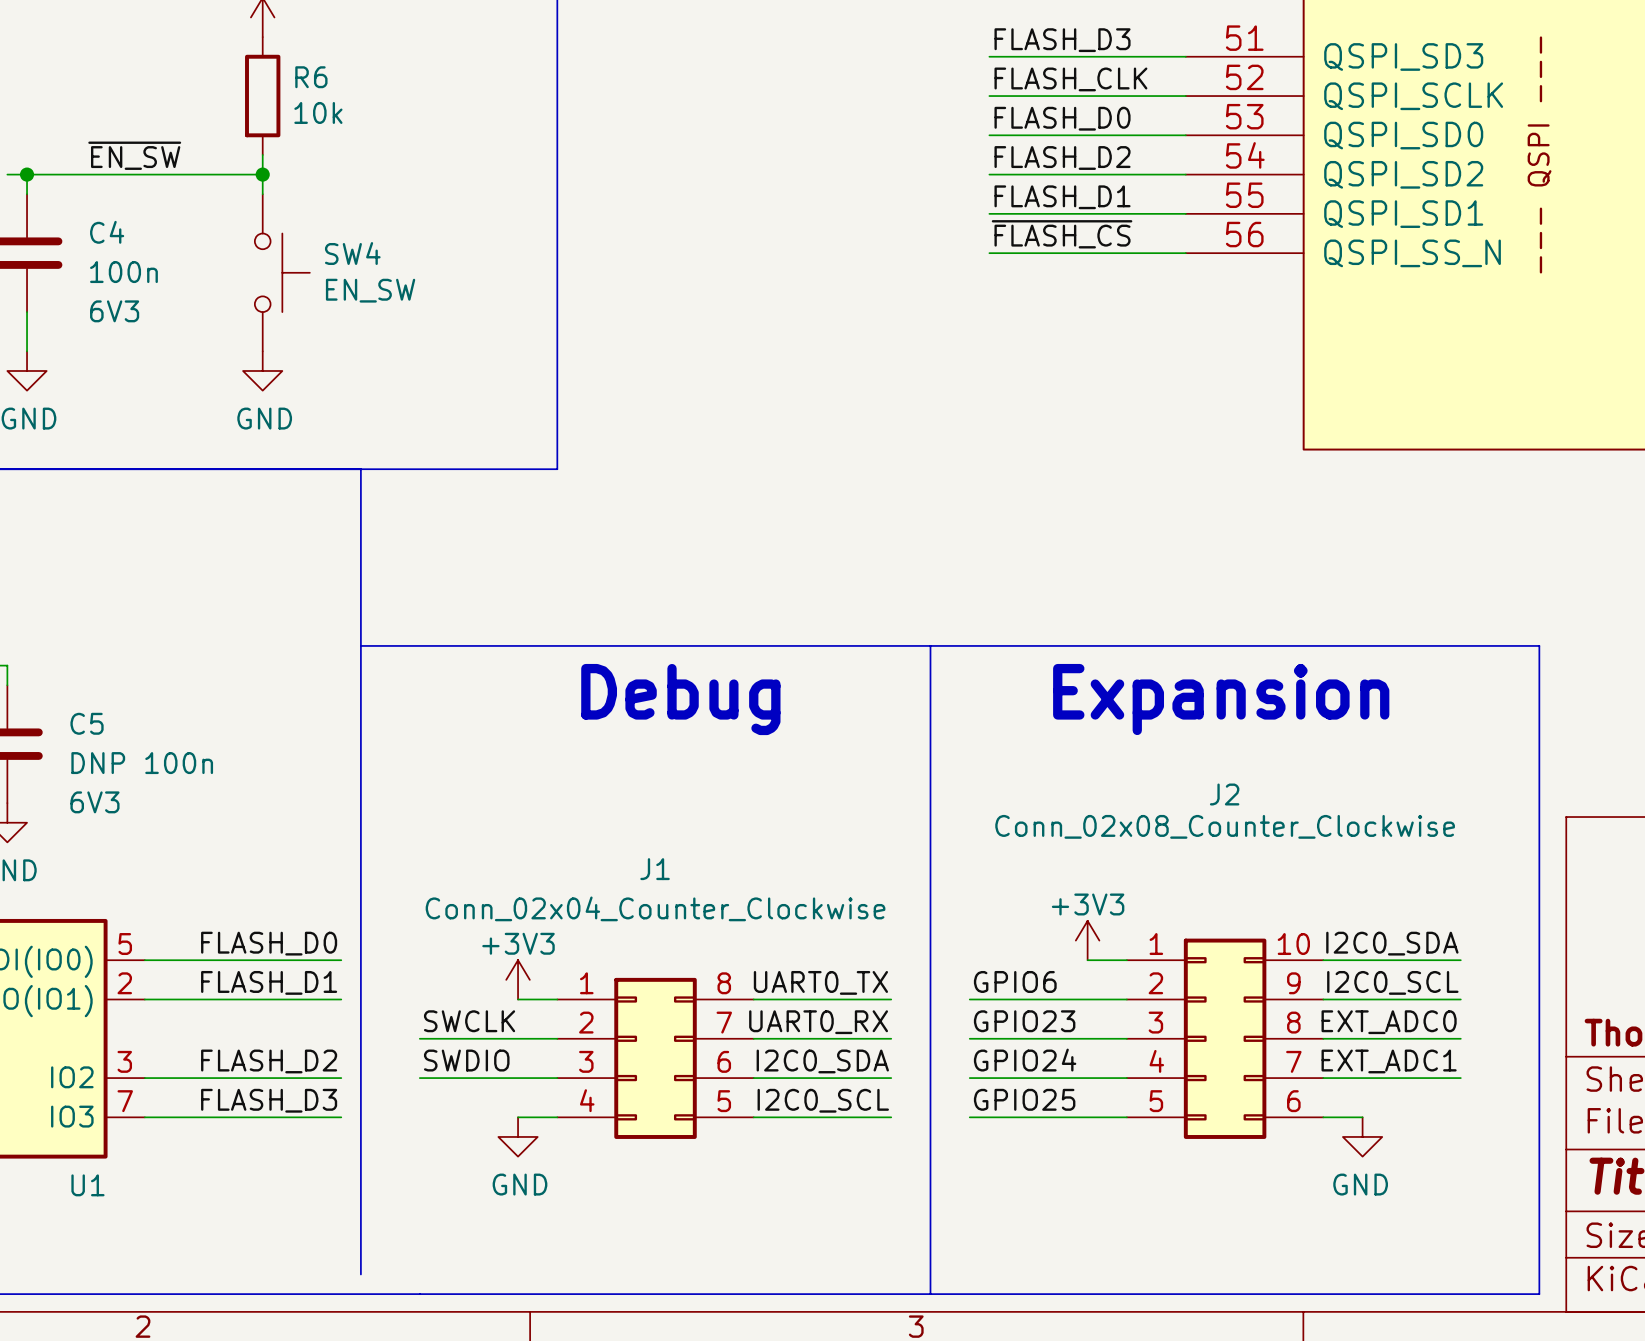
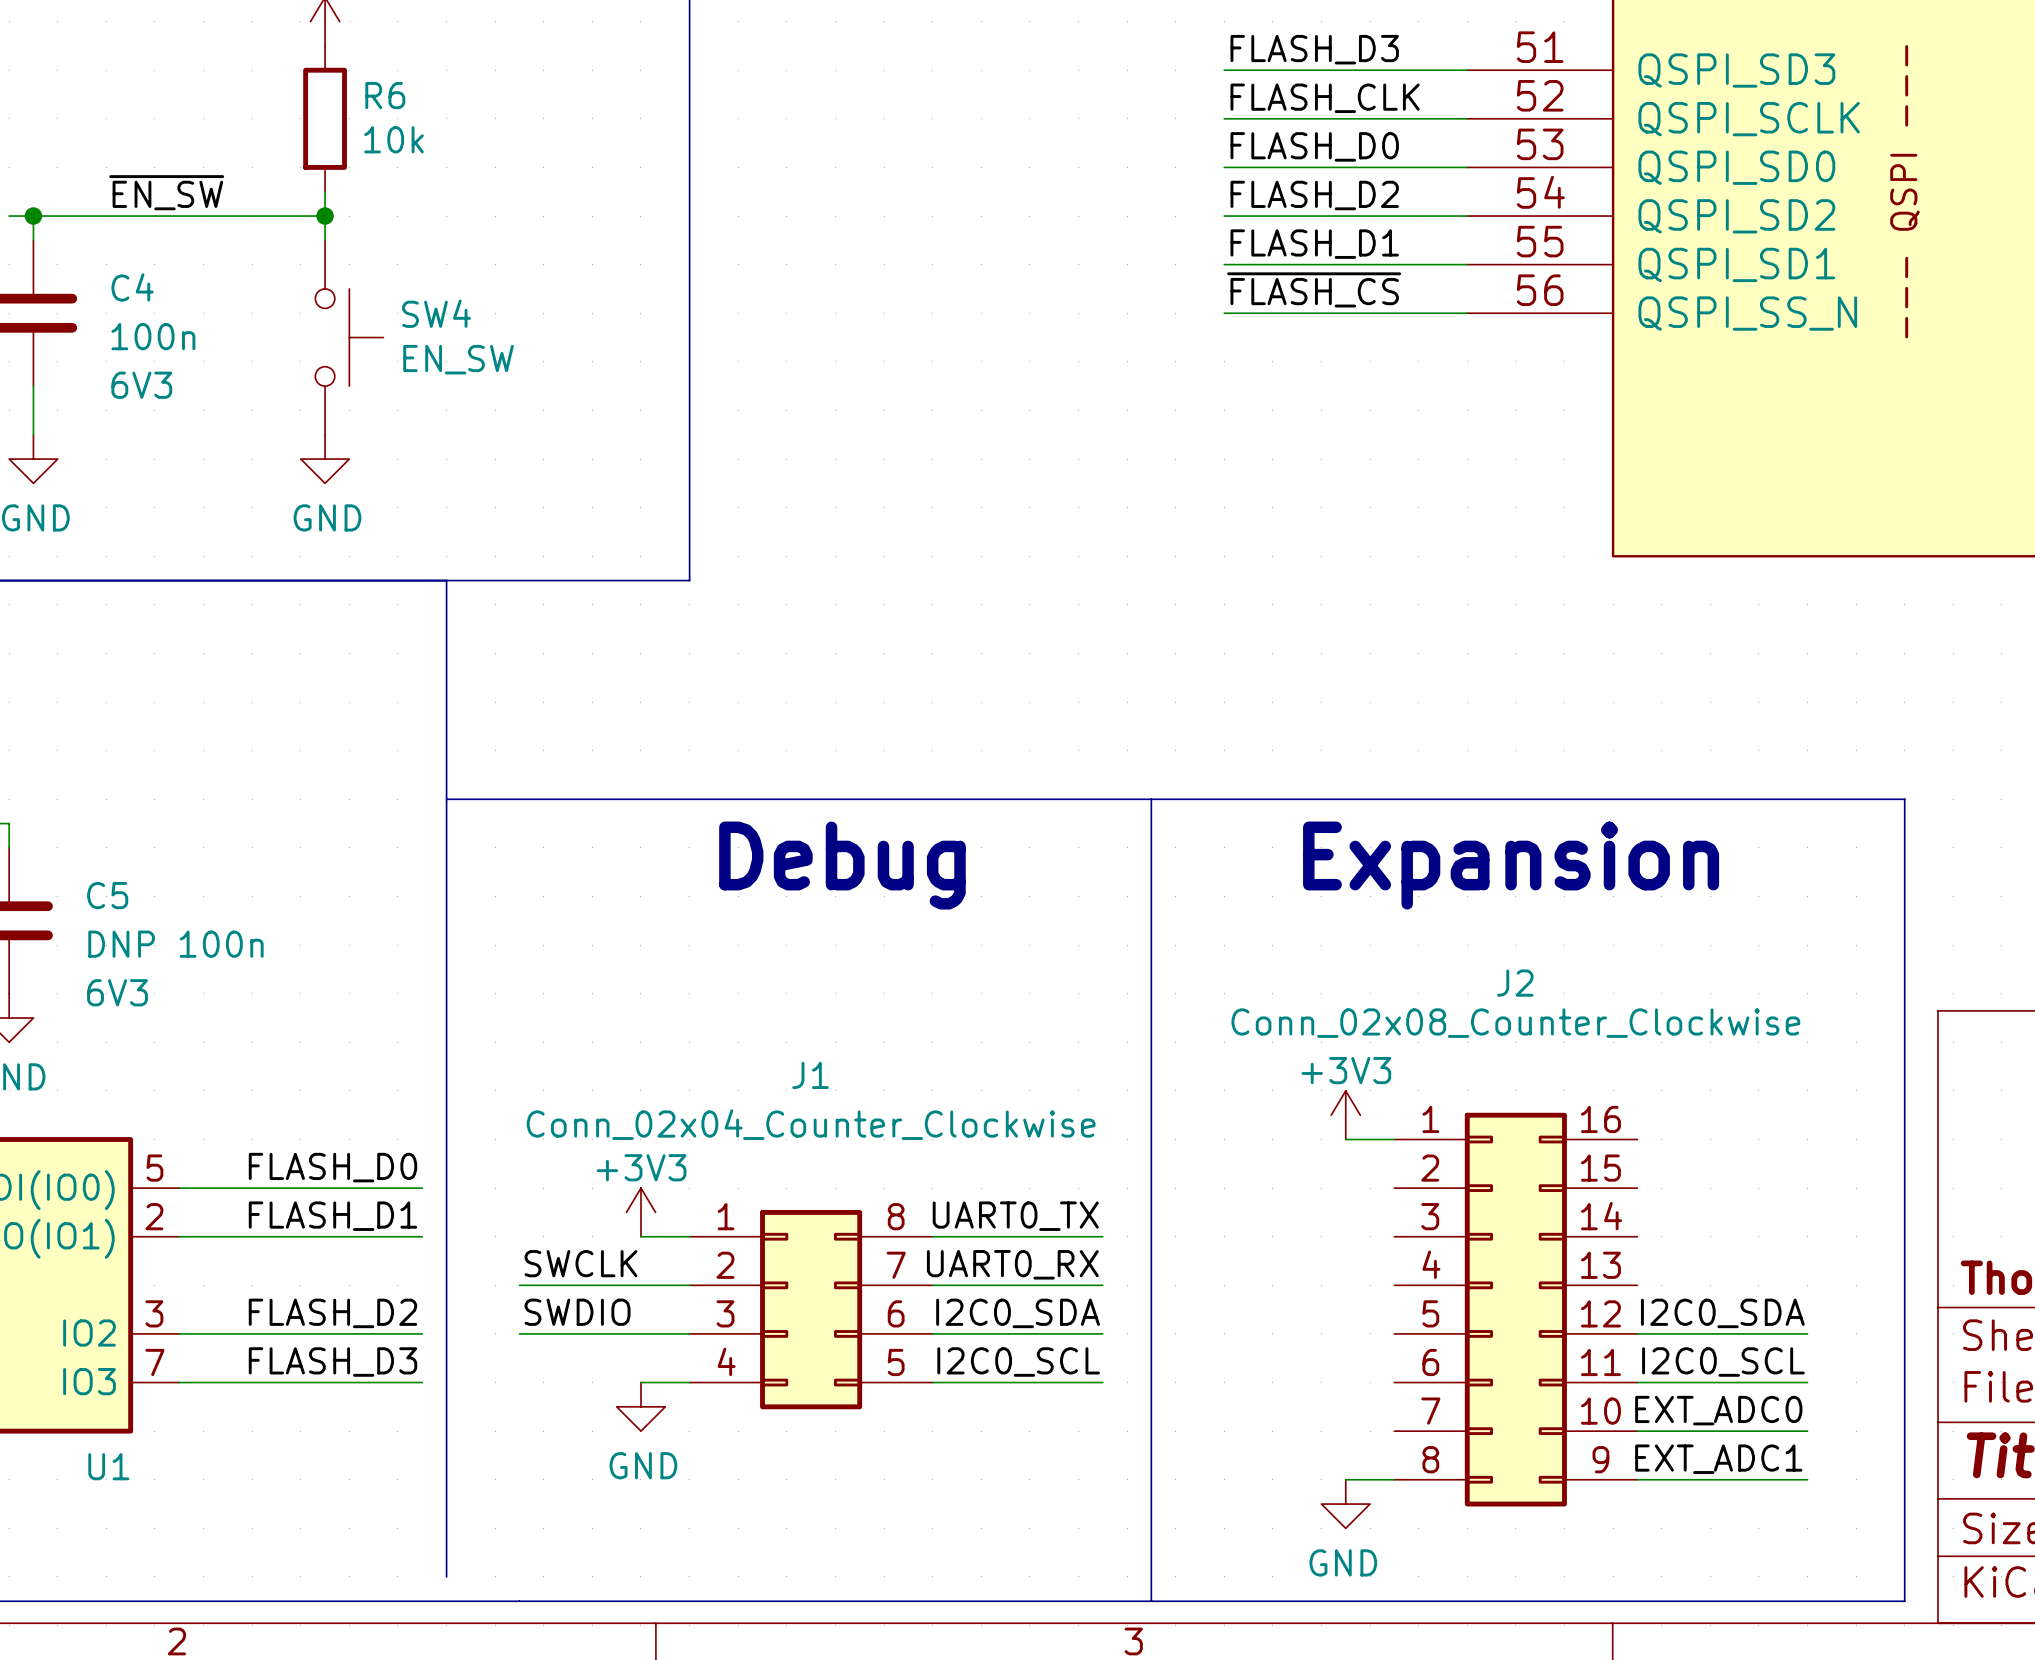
wire: none -> (1345, 1139) (1394, 1139)
J2 symbol: [1126, 938, 1324, 1139] -> [1394, 1112, 1638, 1507]
power symbol position: +3V3 (1087, 940) -> +3V3 (1345, 1115)
label: I2C0_SDA (1392, 943) -> none
wire: (1087, 960) (1126, 960) -> (1345, 1479) (1394, 1479)
wire: (1323, 960) (1460, 960) -> none
label: GPIO6 (1015, 981) -> none
label position: I2C0_SCL (1392, 982) -> I2C0_SCL (1723, 1362)
wire: (969, 999) (1126, 999) -> none
wire: (1323, 999) (1460, 999) -> (1637, 1431) (1807, 1431)
label: GPIO23 (1024, 1021) -> none
label position: EXT_ADC0 (1389, 1022) -> EXT_ADC0 (1718, 1410)
wire: (969, 1038) (1126, 1038) -> none
wire: (1323, 1038) (1460, 1038) -> (1637, 1479) (1807, 1479)
label: GPIO24 (1025, 1060) -> none
label: EXT_ADC1 (1389, 1061) -> I2C0_SDA (1722, 1313)
wire: (969, 1078) (1126, 1078) -> none
label: GPIO25 (1024, 1099) -> none
wire: (969, 1117) (1126, 1117) -> none
wire: none -> (1685, 1382) (1807, 1382)
power symbol position: GND (1362, 1136) -> GND (1345, 1504)
label: none -> EXT_ADC1 (1718, 1459)

